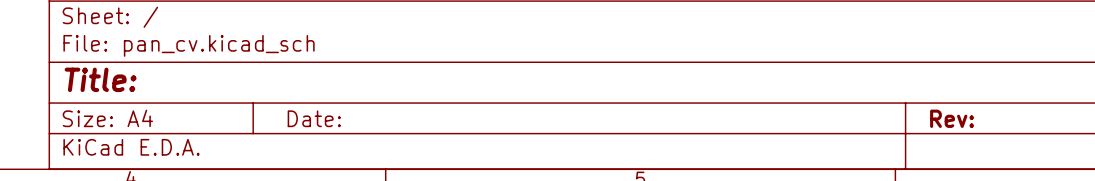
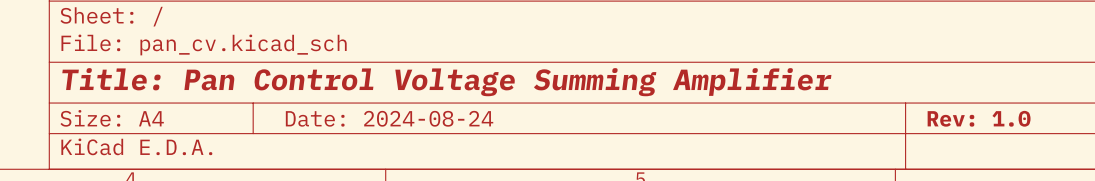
title block: Title: (100, 79) -> Title: Pan Control Voltage Summing Amplifier (446, 82)
title block: Date: (314, 118) -> Date: 2024-08-24 (389, 118)
title block: Rev: (952, 118) -> Rev: 1.0 (979, 118)

